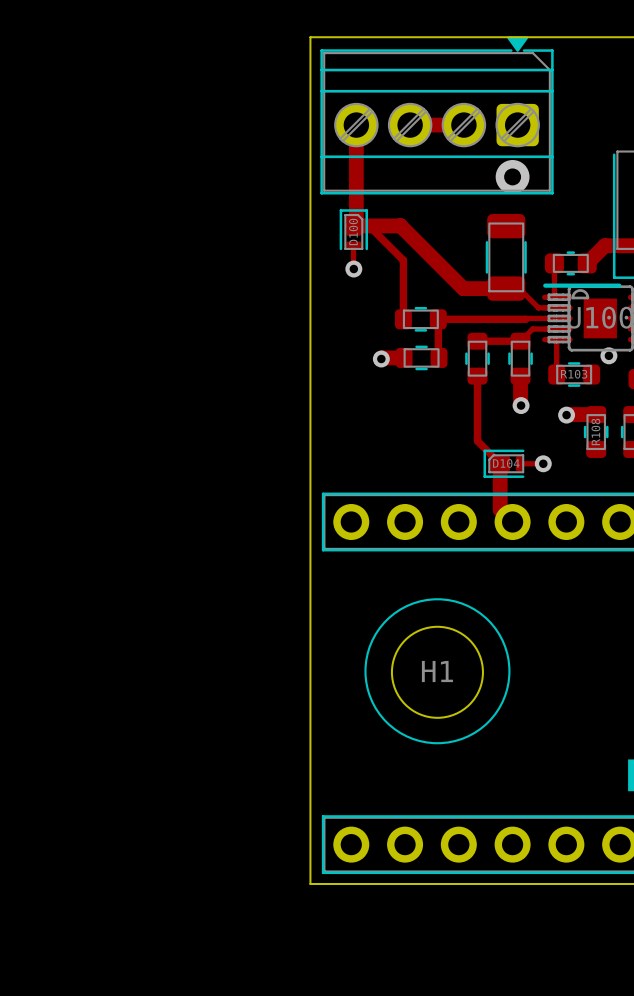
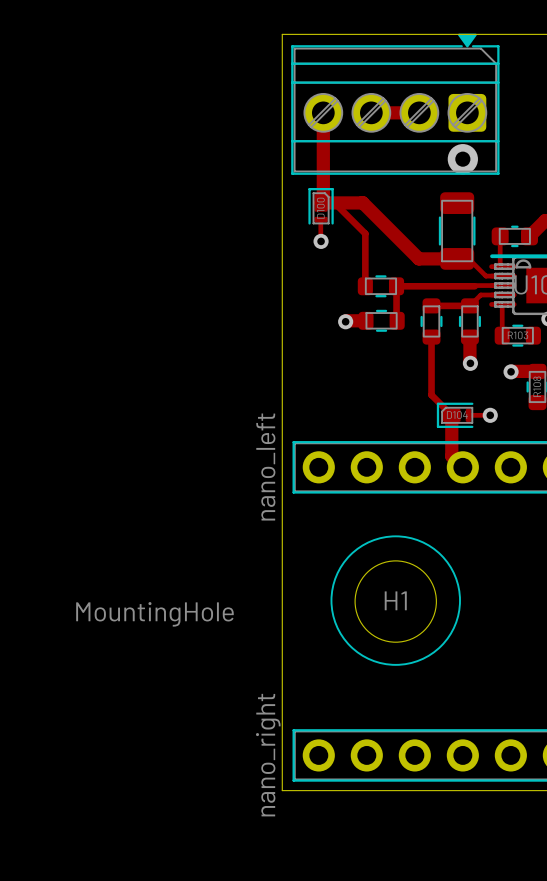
part value: none -> nano_left (265, 467)
H1 value: none -> MountingHole (154, 614)
part value: none -> nano_right (268, 755)

